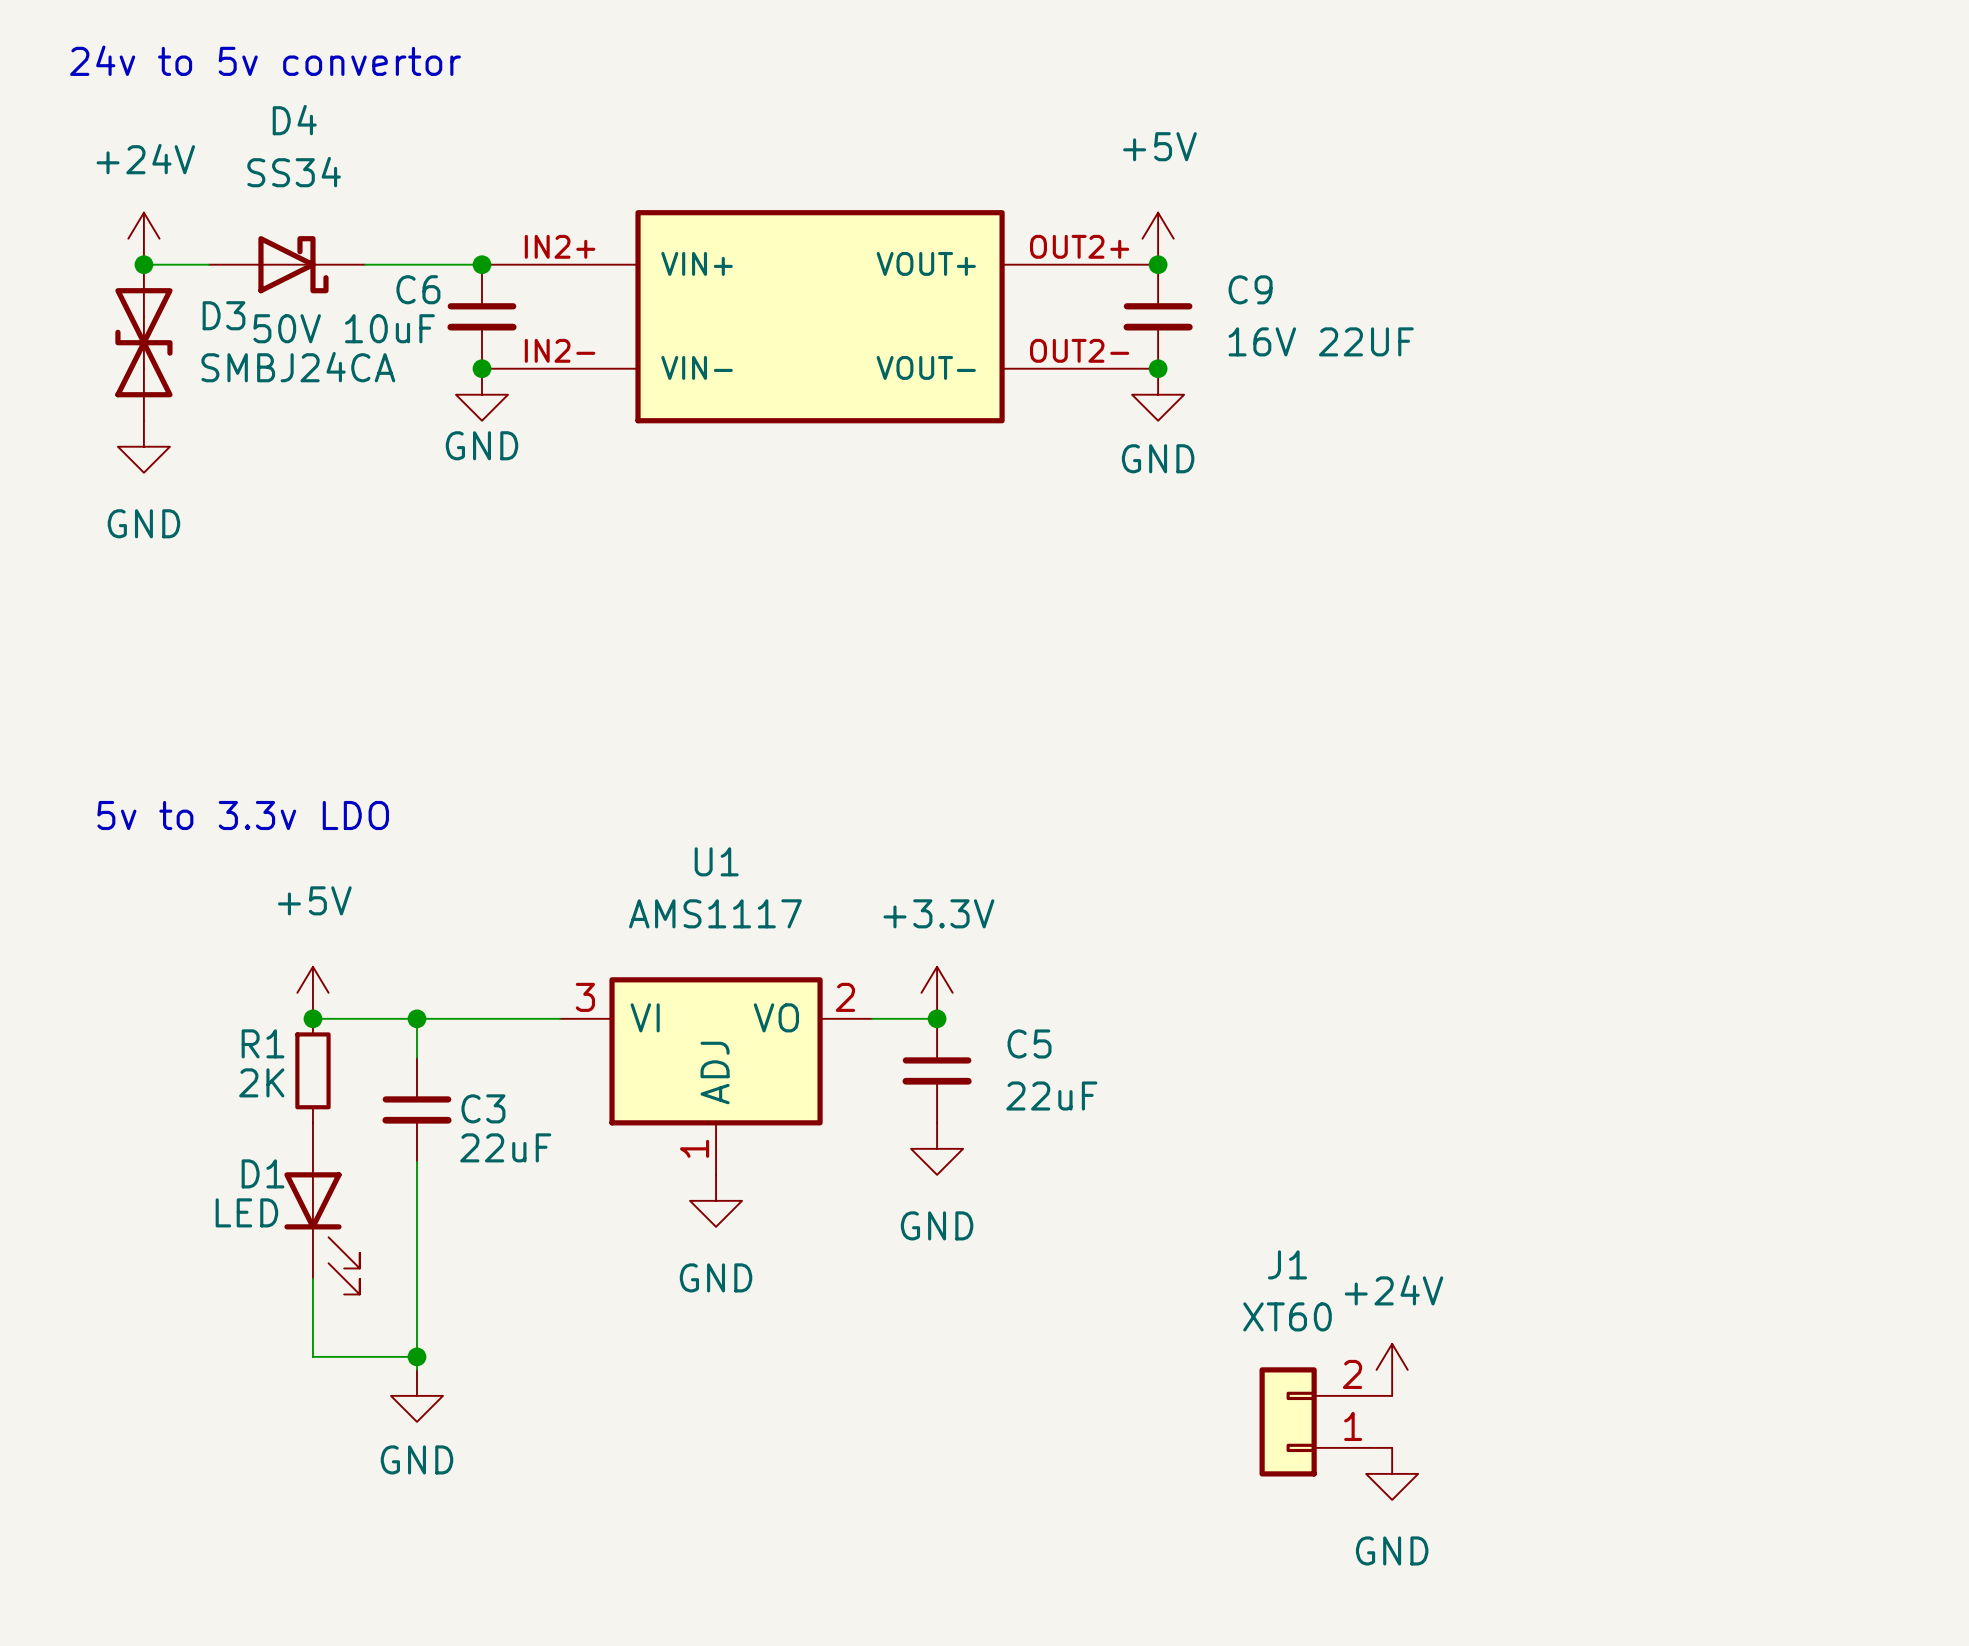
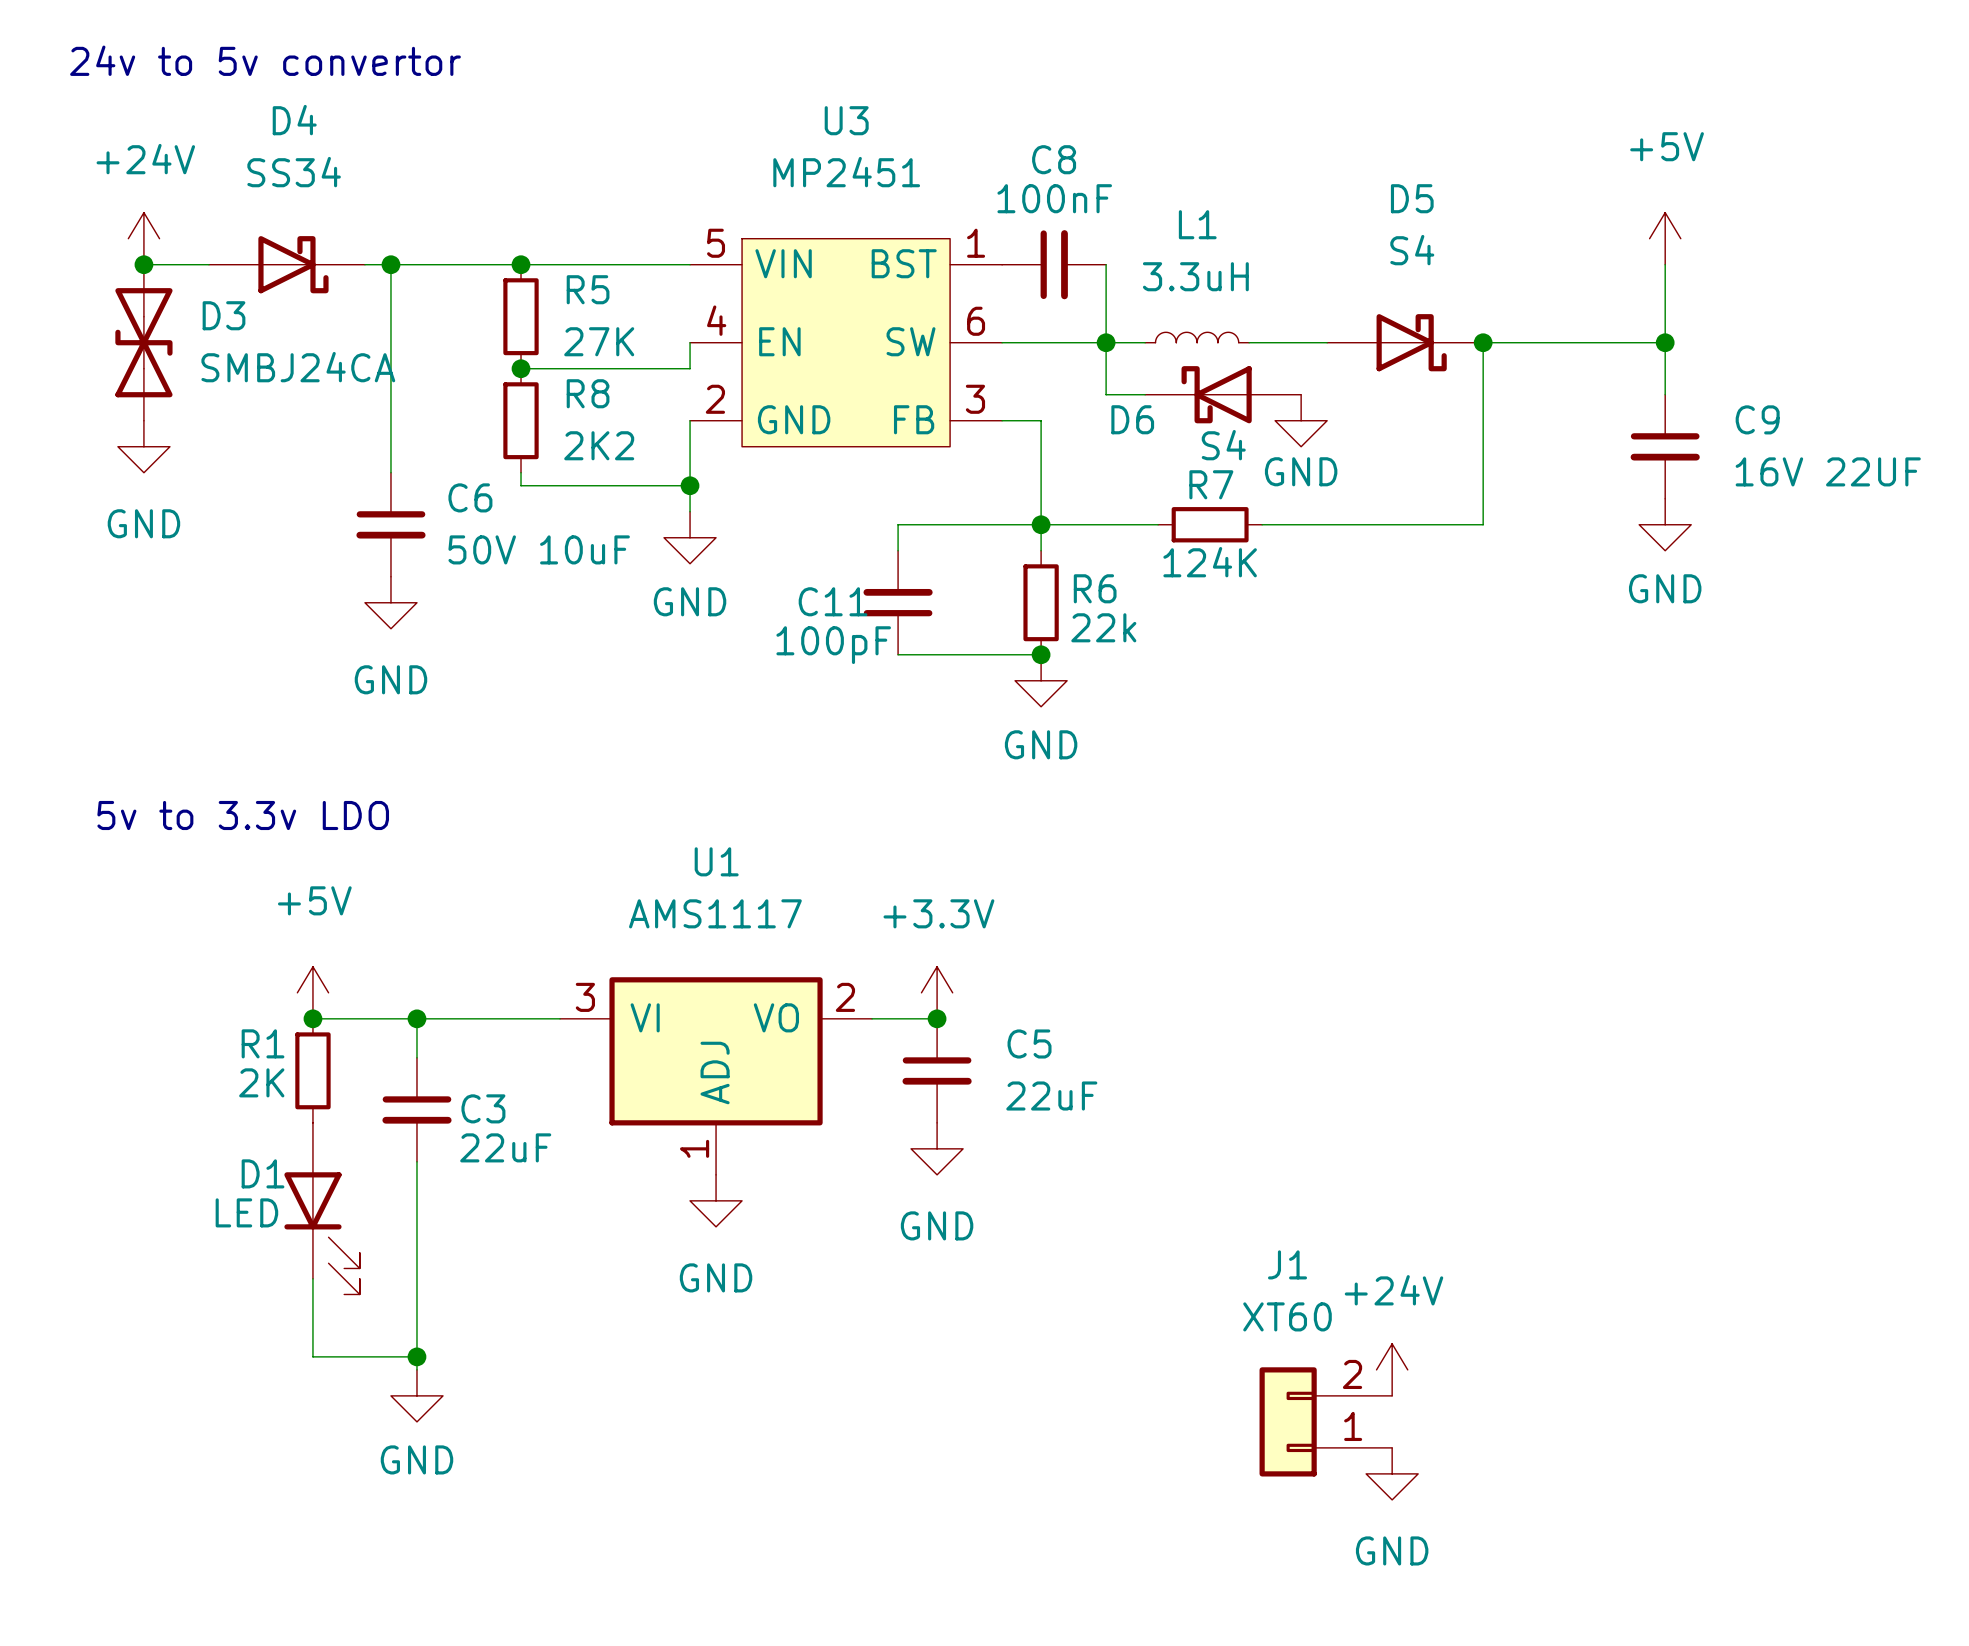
power symbol position: +5V (1158, 238) -> +5V (1665, 238)
wire: none -> (390, 264) (390, 472)
junction: none -> (390, 264)
junction position: (482, 264) -> (521, 264)
C8: none -> 100nF (1054, 264)
wire: none -> (1106, 264) (1106, 394) (1145, 394)
junction: (1158, 264) -> none
wire: none -> (1665, 264) (1665, 394)
C6 name position: C6 (418, 289) -> C6 (470, 497)
C6 position: (482, 316) -> (390, 524)
R5: none -> 27K (521, 316)
part: (820, 316) -> none
C9 position: (1158, 316) -> (1665, 446)
C6 value position: 50V 10uF (344, 328) -> 50V 10uF (539, 549)
L1: none -> 3.3uH (1197, 337)
U3: none -> MP2451 (846, 342)
wire: none -> (1002, 342) (1145, 342)
junction: none -> (1106, 342)
wire: none -> (1249, 342) (1327, 342)
D5: none -> S4 (1405, 342)
junction: none -> (1483, 342)
wire: none -> (1665, 342) (1483, 342) (1483, 524) (1262, 524)
junction: none -> (1665, 342)
junction position: (482, 368) -> (521, 368)
junction: (1158, 368) -> none
power symbol: GND (482, 394) -> none
power symbol position: GND (1158, 394) -> GND (1301, 420)
D6: none -> S4 (1223, 394)
R8: none -> 2K2 (521, 420)
wire: none -> (690, 420) (690, 511)
wire: none -> (1002, 420) (1041, 420) (1041, 550)
power symbol text position: GND (1158, 458) -> GND (1301, 471)
wire: none -> (521, 472) (521, 485) (690, 485)
junction: none -> (690, 485)
junction: none -> (1041, 524)
wire: none -> (1158, 524) (898, 524) (898, 550)
R7: none -> 124K (1210, 524)
power symbol: none -> GND (1665, 524)
power symbol: none -> GND (690, 537)
power symbol: none -> GND (390, 602)
C11: none -> 100pF (898, 602)
R6: none -> 22k (1041, 602)
wire: none -> (898, 654) (1041, 654)
junction: none -> (1041, 654)
power symbol: none -> GND (1041, 680)

